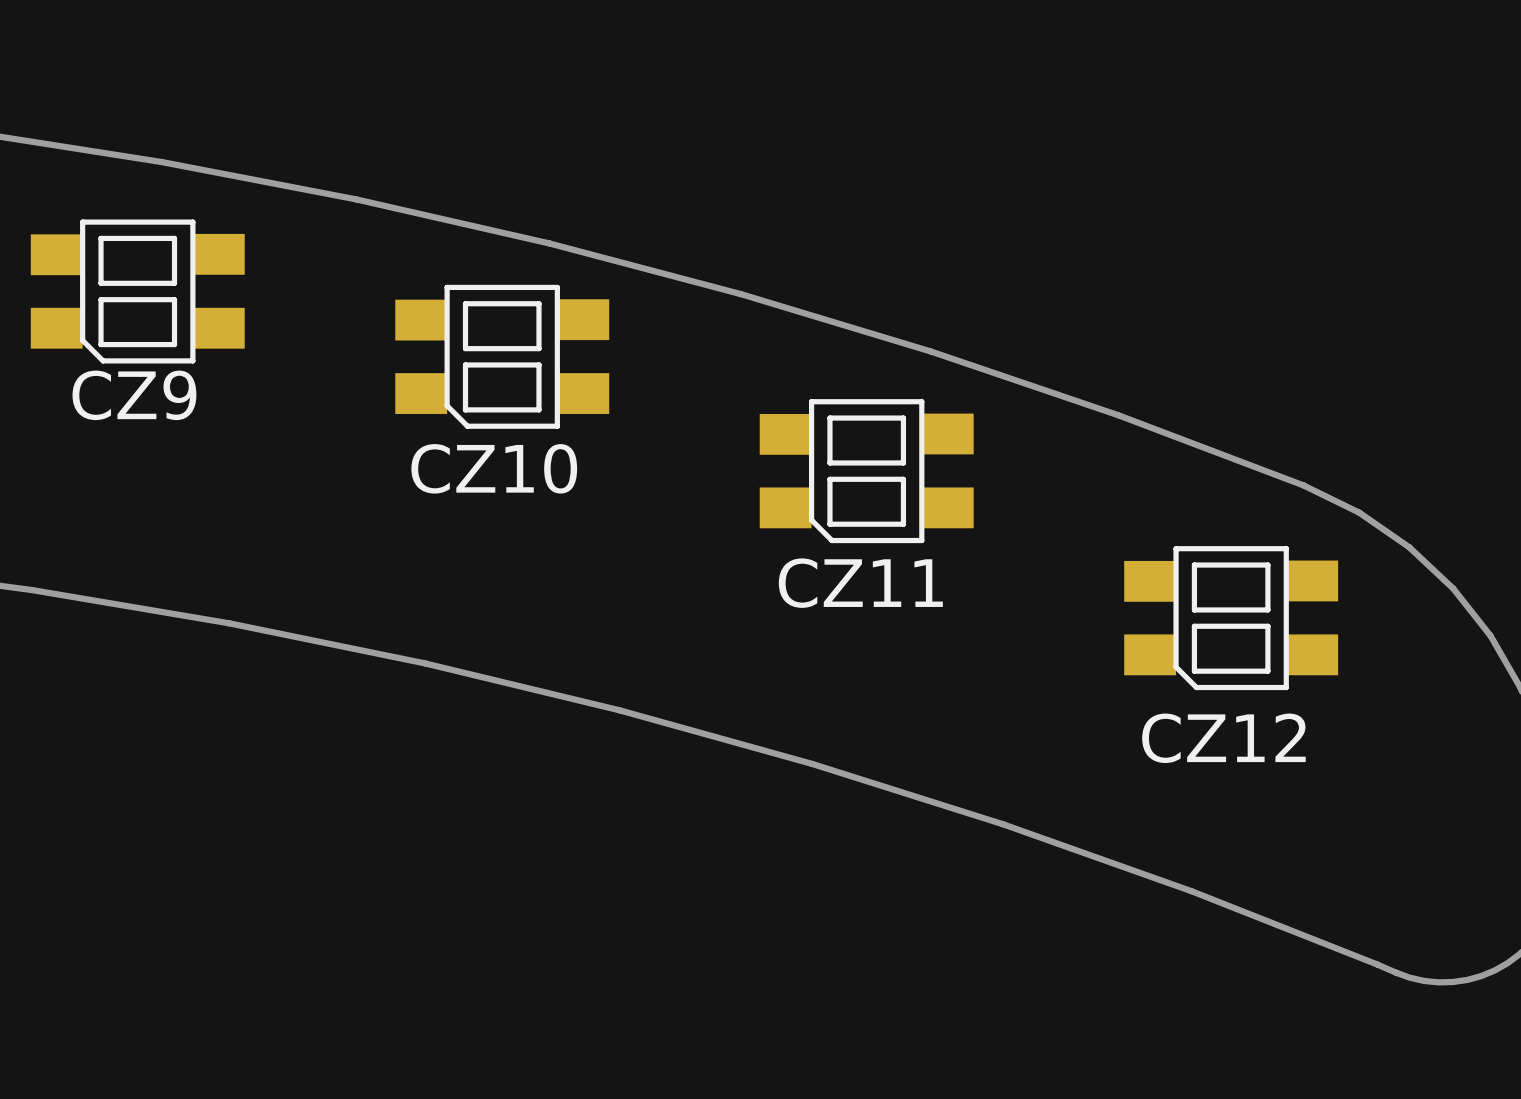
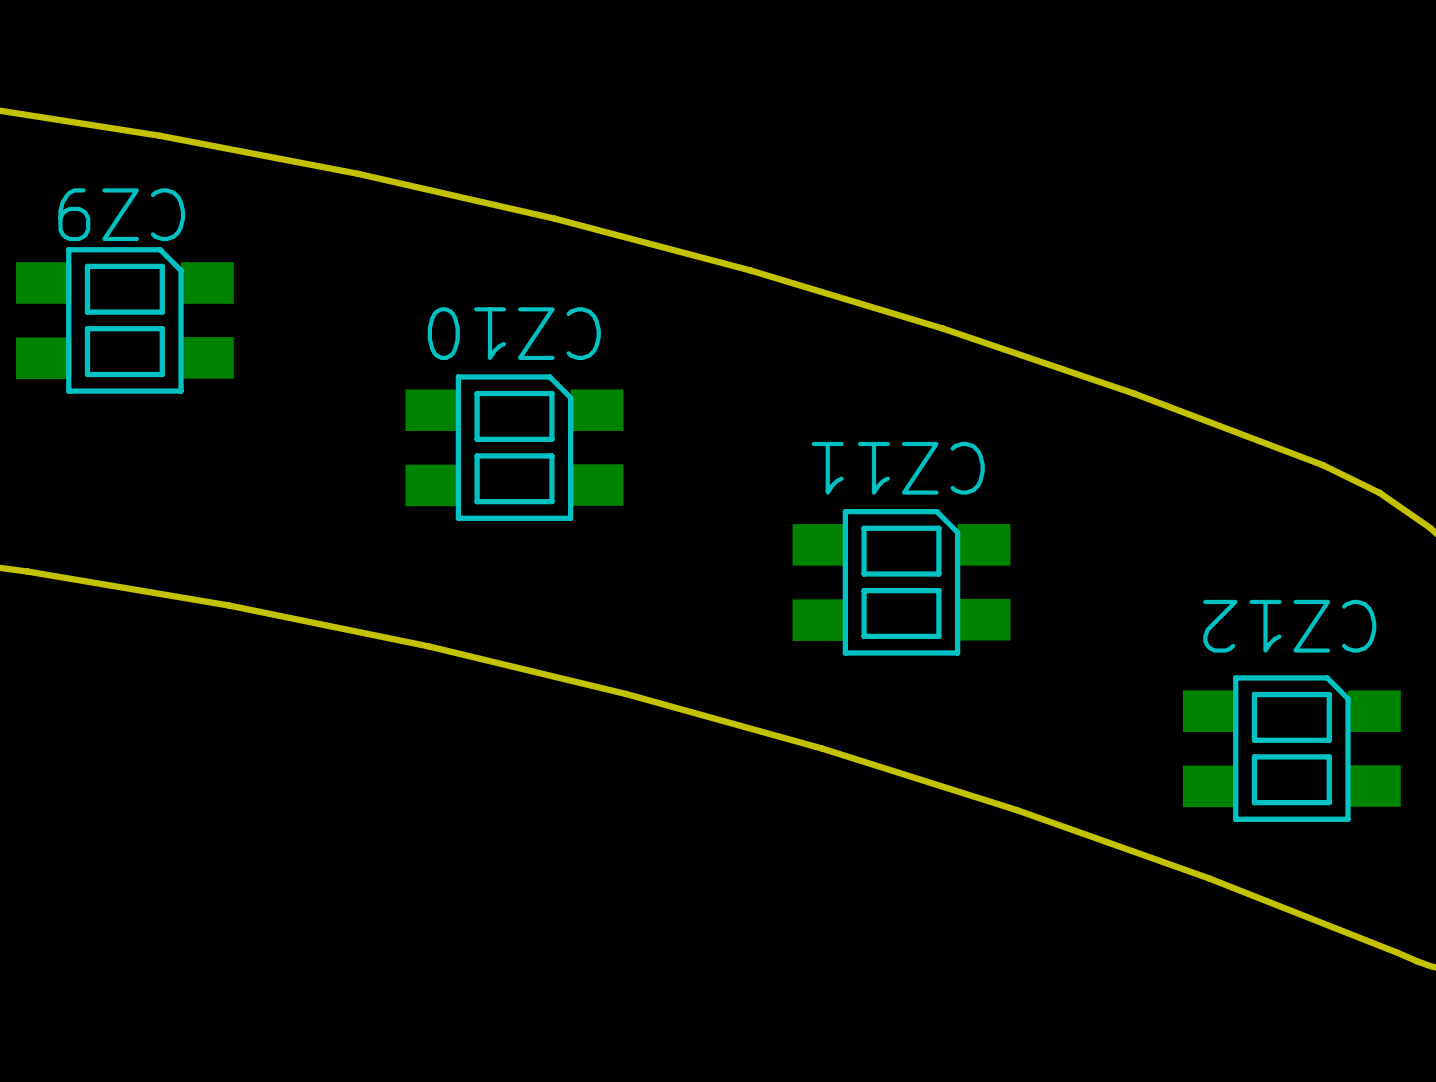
CZ9 rotation: 0° (137, 291) -> 180° (124, 320)
CZ10 rotation: 0° (502, 356) -> 180° (514, 447)
CZ11 rotation: 0° (866, 471) -> 180° (901, 582)
CZ11 position: (866, 471) -> (901, 582)
CZ12 rotation: 0° (1231, 618) -> 180° (1291, 748)
CZ12 position: (1231, 618) -> (1291, 748)

